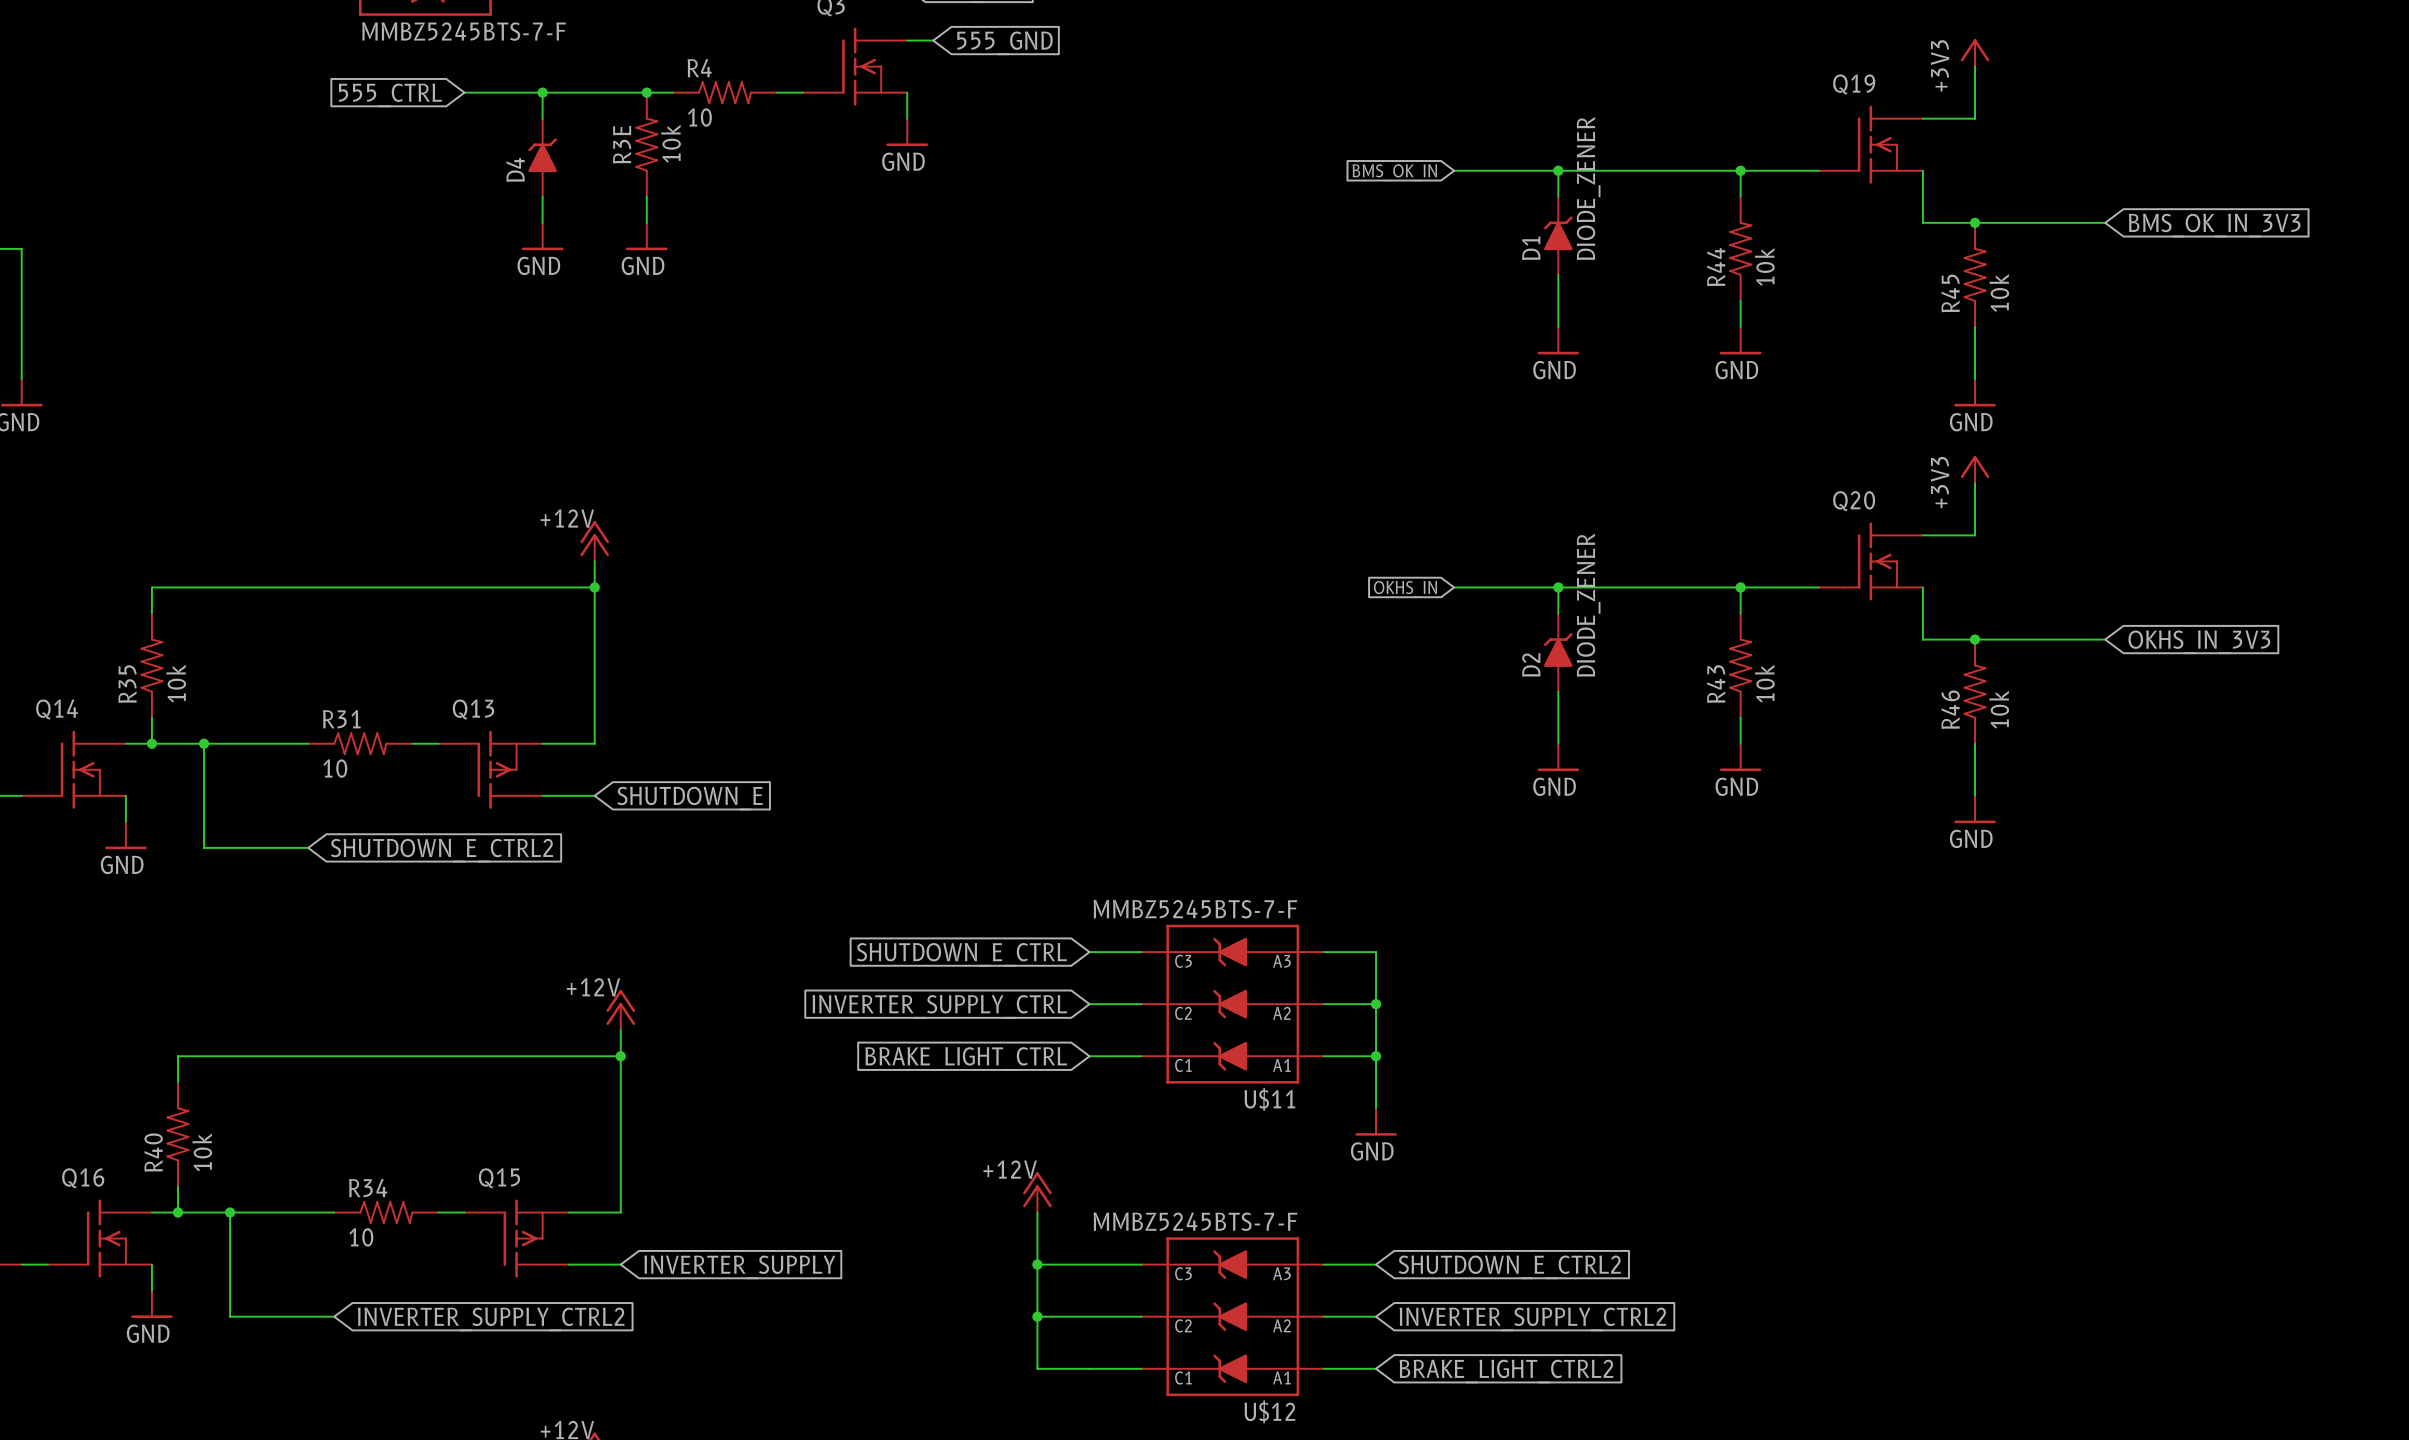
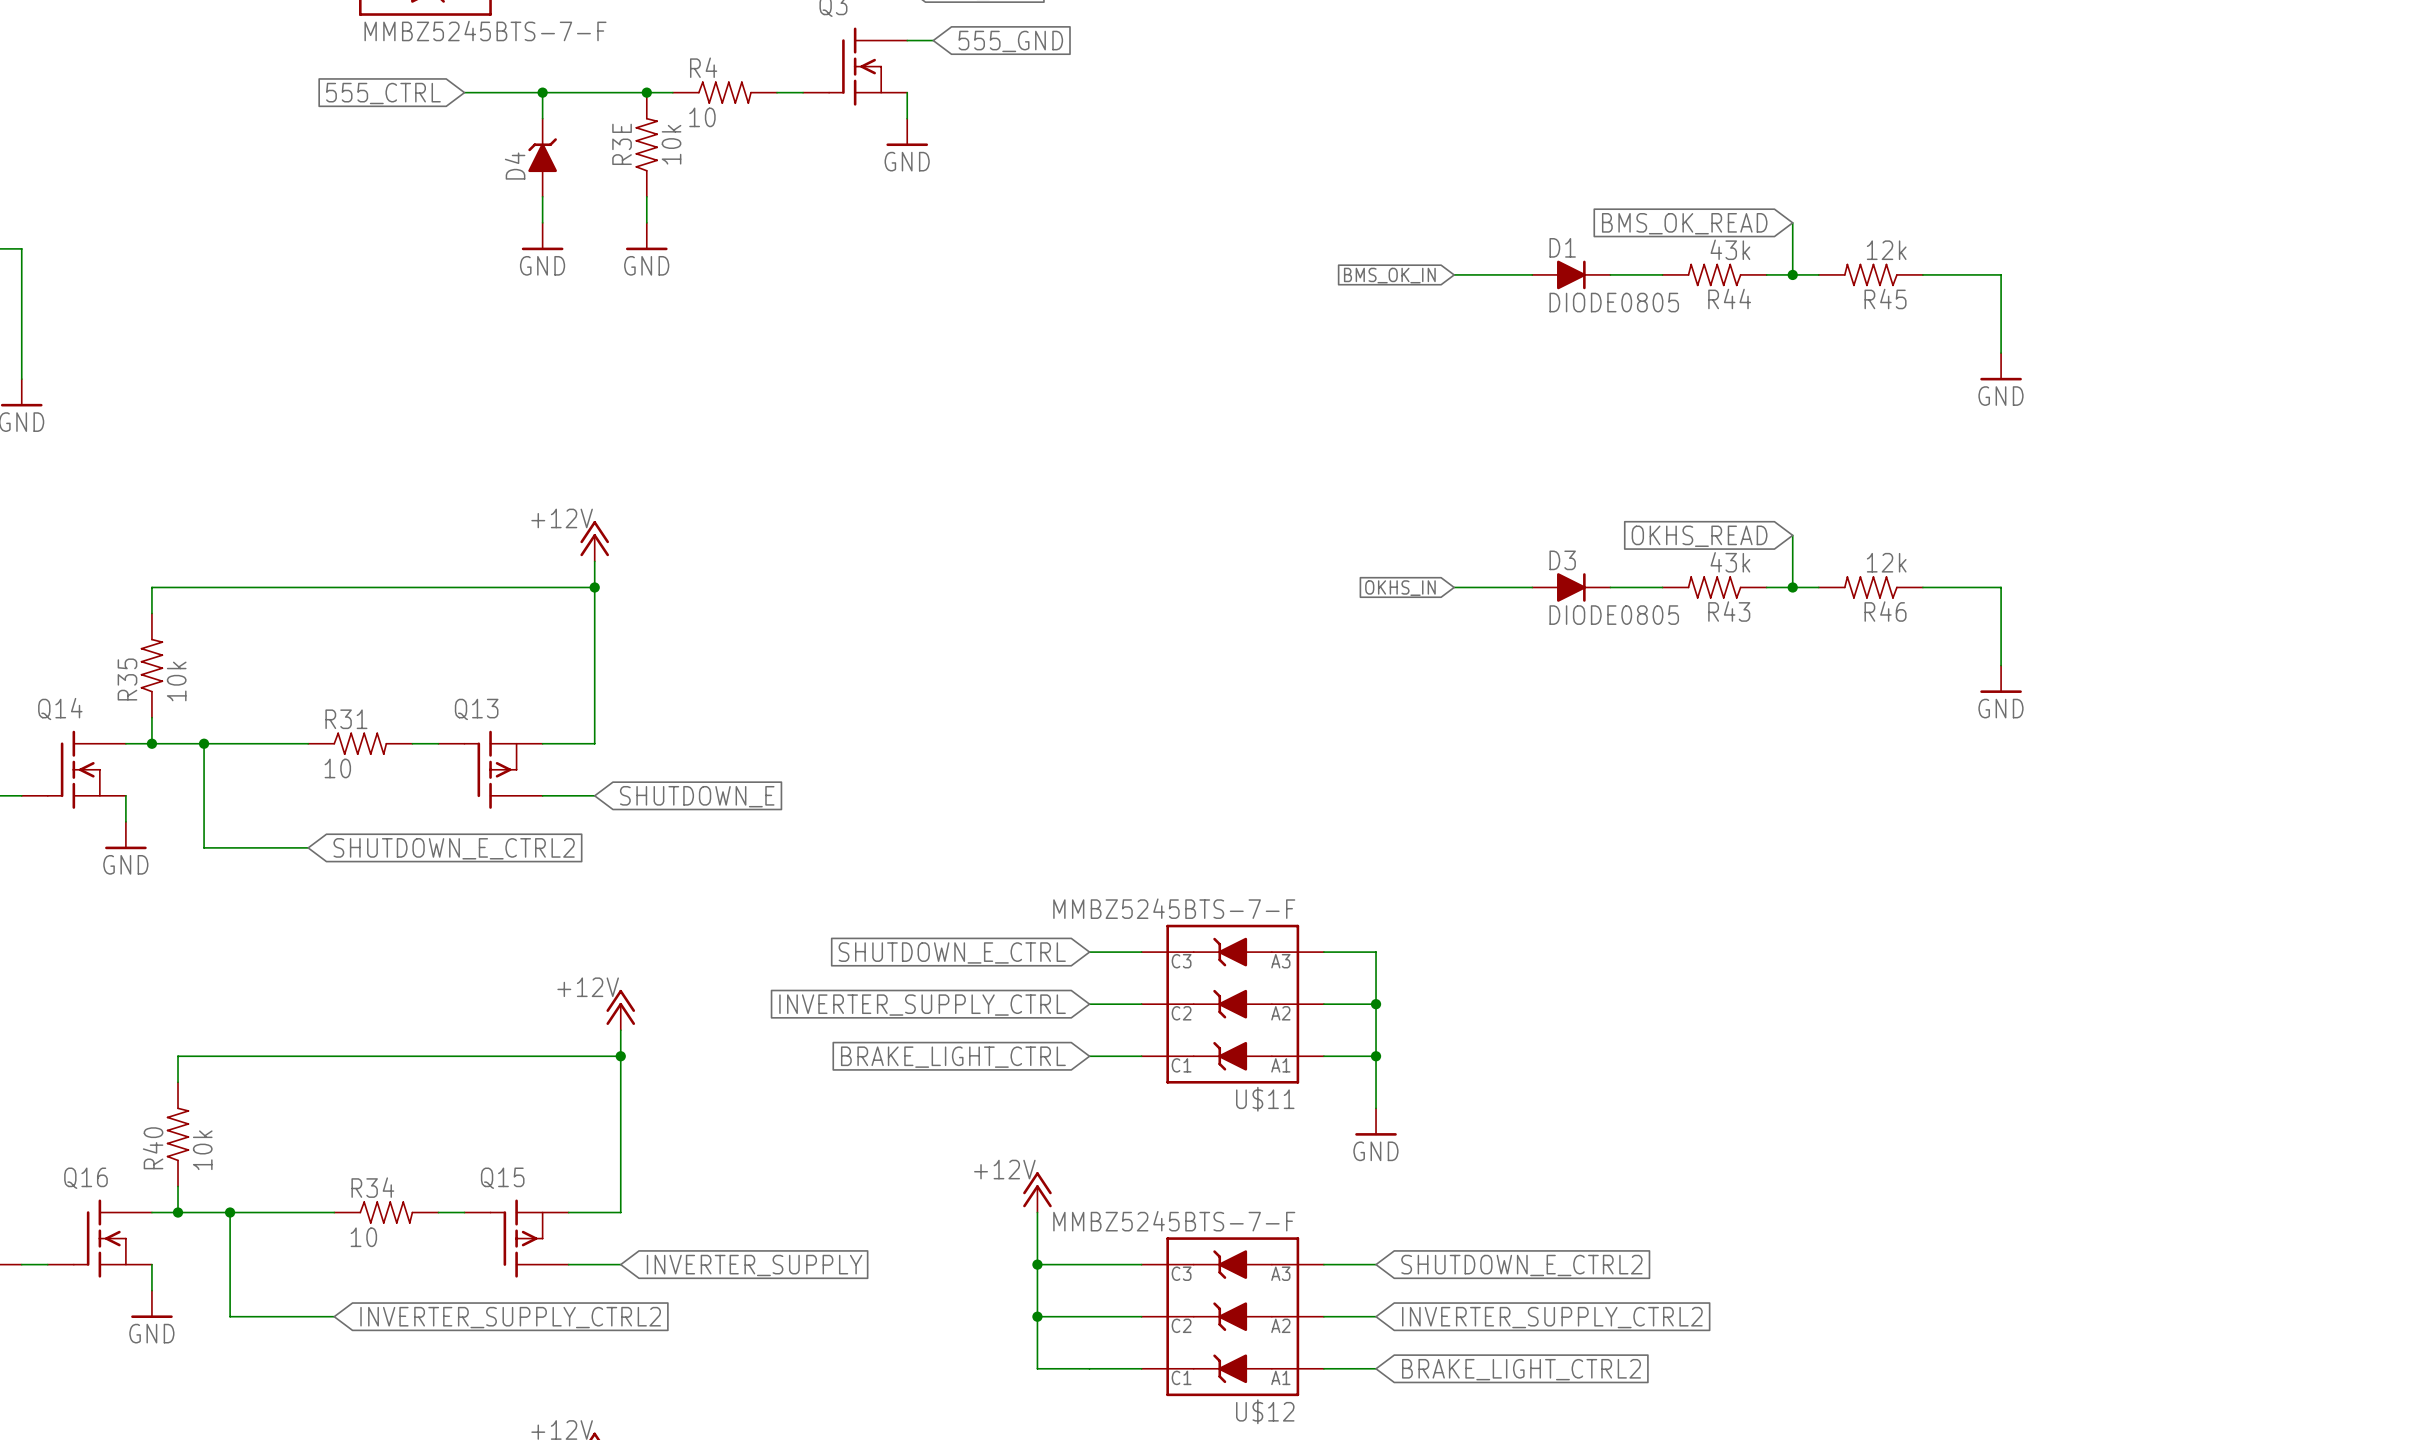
power symbol: +3V3 (1975, 52) -> none
wire: (1975, 66) (1975, 118) (1922, 118) -> none
Q19: (1870, 144) -> none
wire: (1454, 170) (1818, 170) -> none
wire: (1558, 170) (1558, 196) -> none
junction: (1558, 170) -> none
wire: (1740, 170) (1740, 196) -> none
junction: (1740, 170) -> none
wire: (1922, 170) (1922, 222) (2105, 222) -> none
global label position: BMS_OK_IN (1394, 172) -> BMS_OK_IN (1389, 275)
D1 value: DIODE_ZENER (1588, 188) -> DIODE0805 (1614, 302)
D1 symbol: [1544, 196, 1573, 275] -> [1532, 260, 1611, 290]
junction: (1975, 222) -> none
global label: none -> BMS_OK_READ (1684, 223)
global label: BMS_OK_IN_3V3 (2214, 225) -> none
D1 name position: D1 (1531, 248) -> D1 (1562, 247)
R44 rotation: 0° (1740, 248) -> 90° counterclockwise (1714, 274)
R44 value: 10k (1764, 266) -> 43k (1730, 249)
wire: none -> (1454, 274) (1532, 274)
wire: (1558, 274) (1558, 327) -> none
wire: none -> (1610, 274) (1662, 274)
wire: none -> (1766, 274) (1818, 274)
junction: none -> (1792, 274)
wire: none -> (1922, 274) (2001, 274) (2001, 353)
R45 rotation: 0° (1975, 274) -> 90° counterclockwise (1870, 274)
R45 position: (1975, 274) -> (1870, 274)
R45 value: 10k (1999, 292) -> 12k (1886, 250)
wire: (1740, 300) (1740, 327) -> none
wire: (1975, 327) (1975, 379) -> (1792, 222) (1792, 274)
power symbol: GND (1558, 340) -> none
power symbol: GND (1740, 340) -> none
power symbol position: GND (1975, 392) -> GND (2001, 366)
power symbol: +3V3 (1975, 469) -> none
wire: (1975, 483) (1975, 535) (1922, 535) -> none
wire: none -> (1792, 535) (1792, 587)
global label: none -> OKHS_READ (1699, 536)
Q20: (1870, 561) -> none
junction: (1558, 587) -> none
D3: none -> DIODE0805 (1571, 587)
wire: (1740, 587) (1740, 613) -> none
junction position: (1740, 587) -> (1792, 587)
wire: (1922, 587) (1922, 639) (2105, 639) -> (1922, 587) (2001, 587) (2001, 665)
junction: (1975, 639) -> none
global label: OKHS_IN_3V3 (2199, 642) -> none
D2: DIODE_ZENER (1558, 652) -> none
R43 rotation: 0° (1740, 665) -> 90° counterclockwise (1714, 587)
R43 position: (1740, 665) -> (1714, 587)
R43 value: 10k (1764, 683) -> 43k (1730, 562)
wire: (1558, 691) (1558, 743) -> none
R46 rotation: 0° (1975, 691) -> 90° counterclockwise (1870, 587)
R46 position: (1975, 691) -> (1870, 587)
R46 value: 10k (1999, 709) -> 12k (1886, 562)
wire: (1740, 717) (1740, 743) -> none
wire: (1975, 743) (1975, 795) -> none
power symbol: GND (1558, 757) -> none
power symbol: GND (1740, 757) -> none
power symbol position: GND (1975, 809) -> GND (2001, 679)

